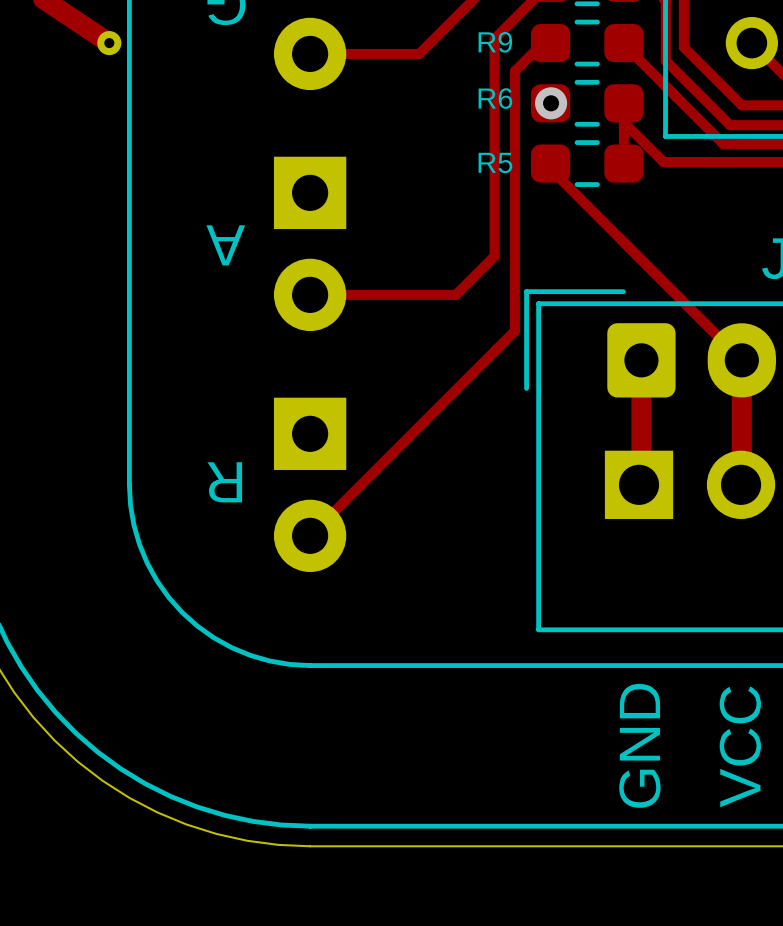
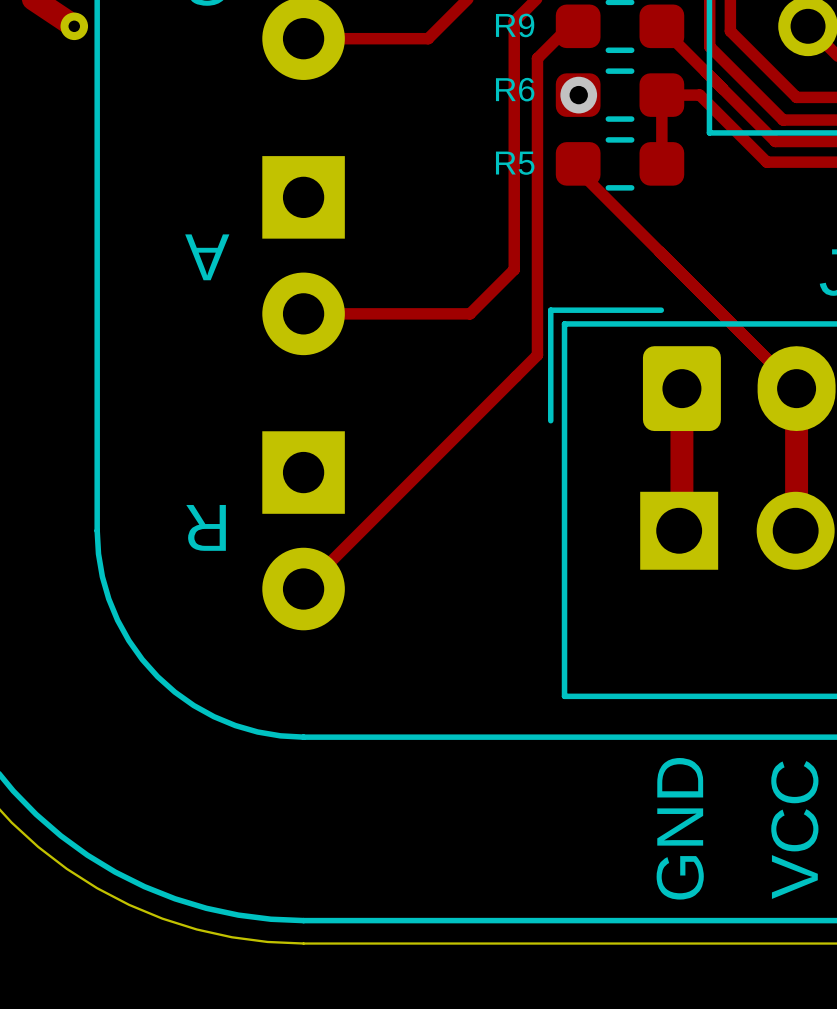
track: (623, 122) (663, 162) (715, 162) -> (661, 95) (699, 95) (766, 162)

